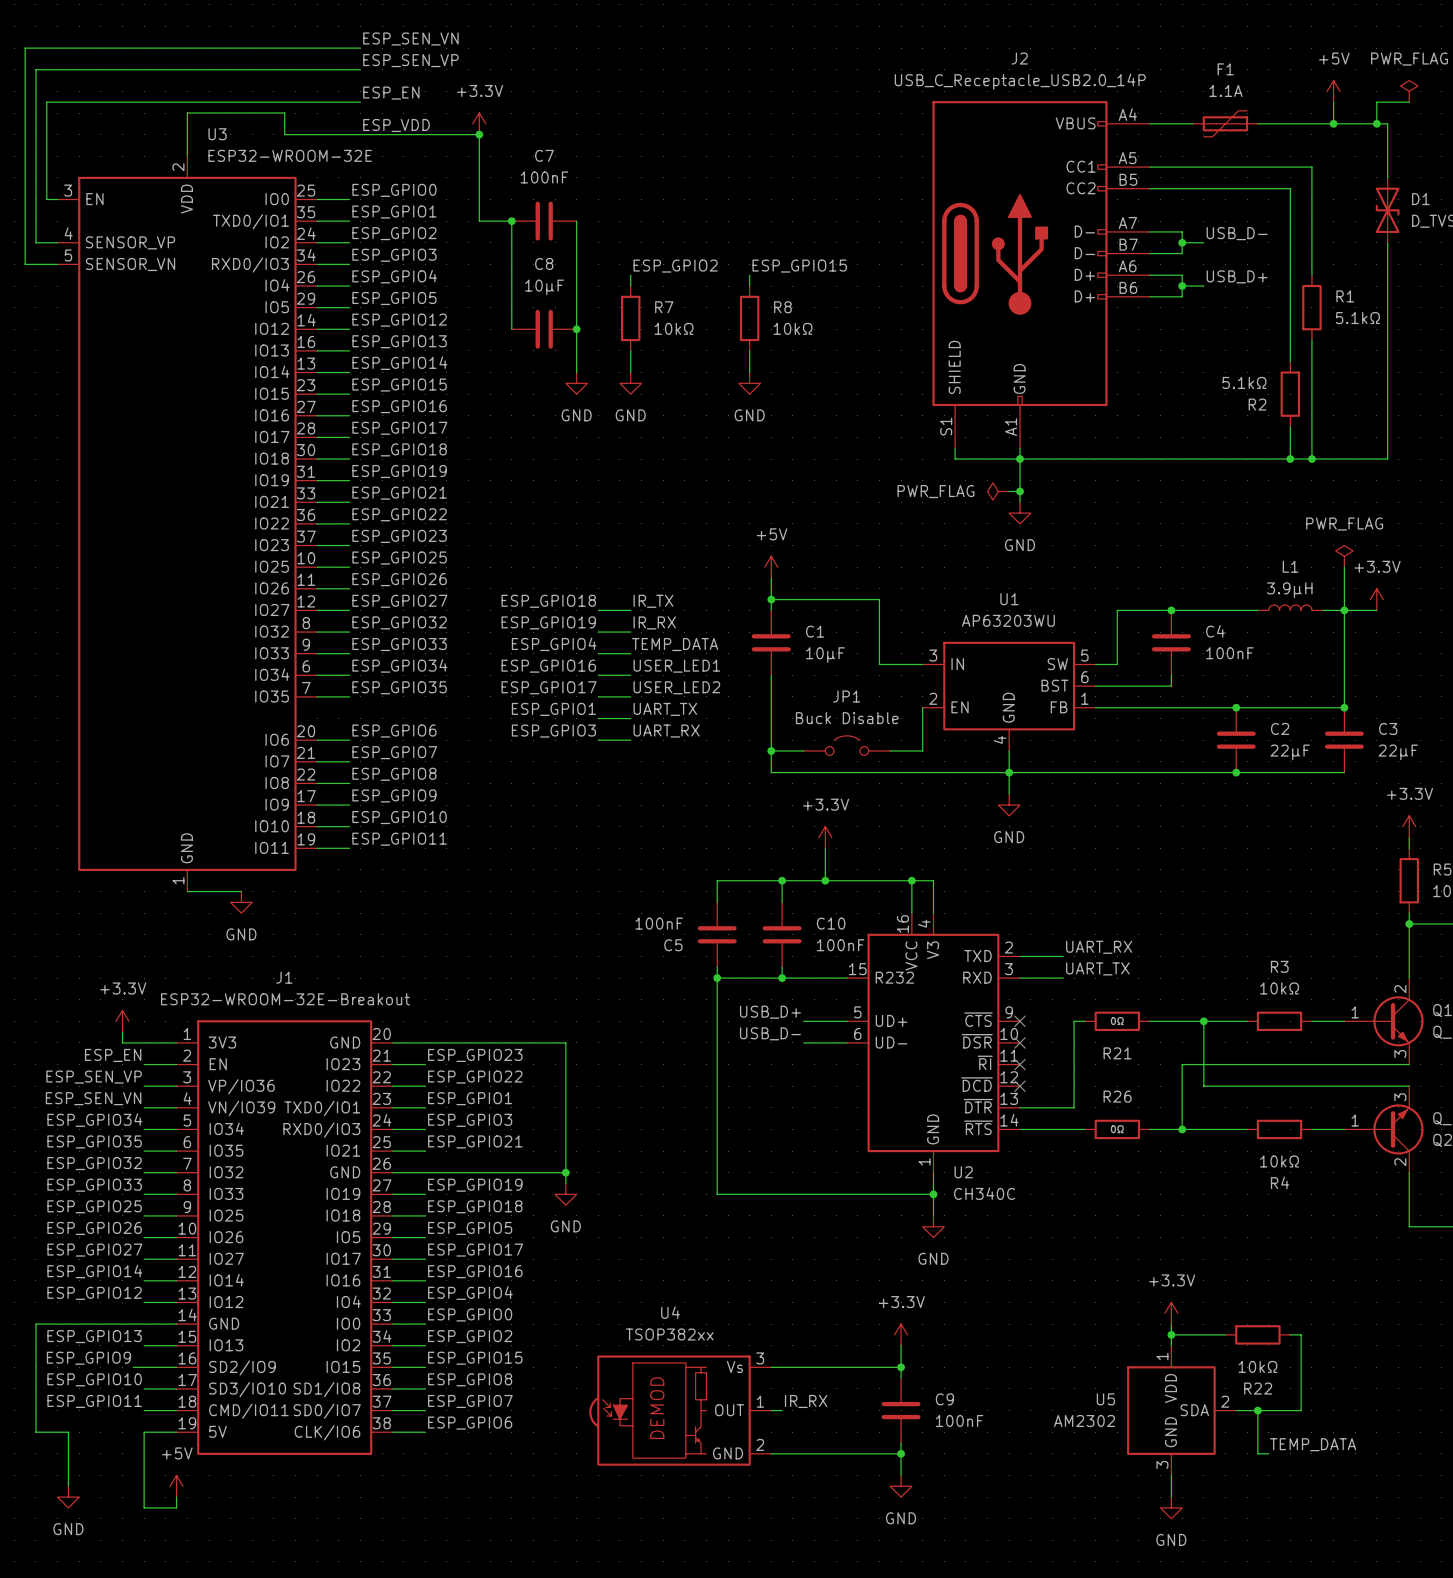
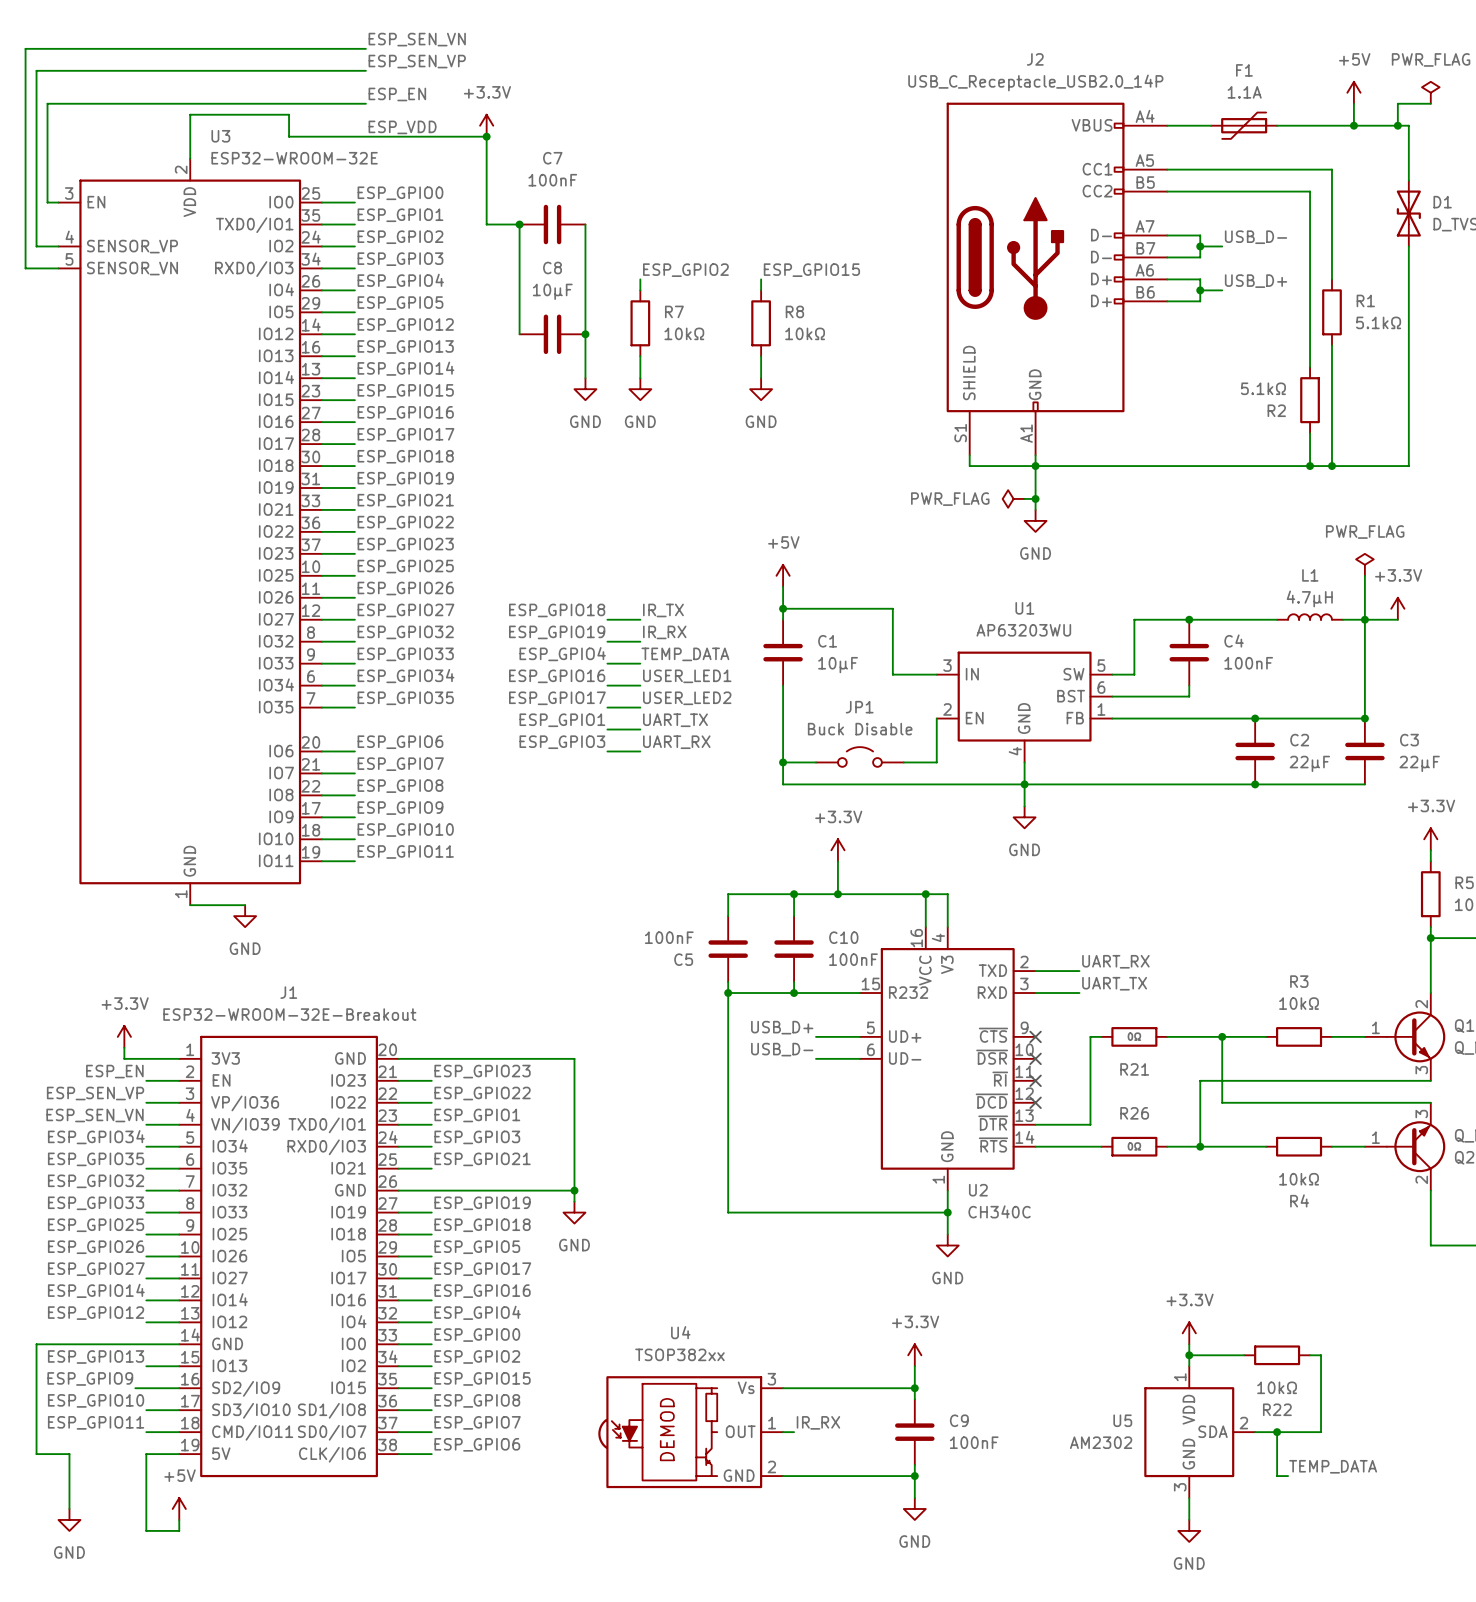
L1 value: 3.9µH (1289, 590) -> 4.7µH (1309, 598)

